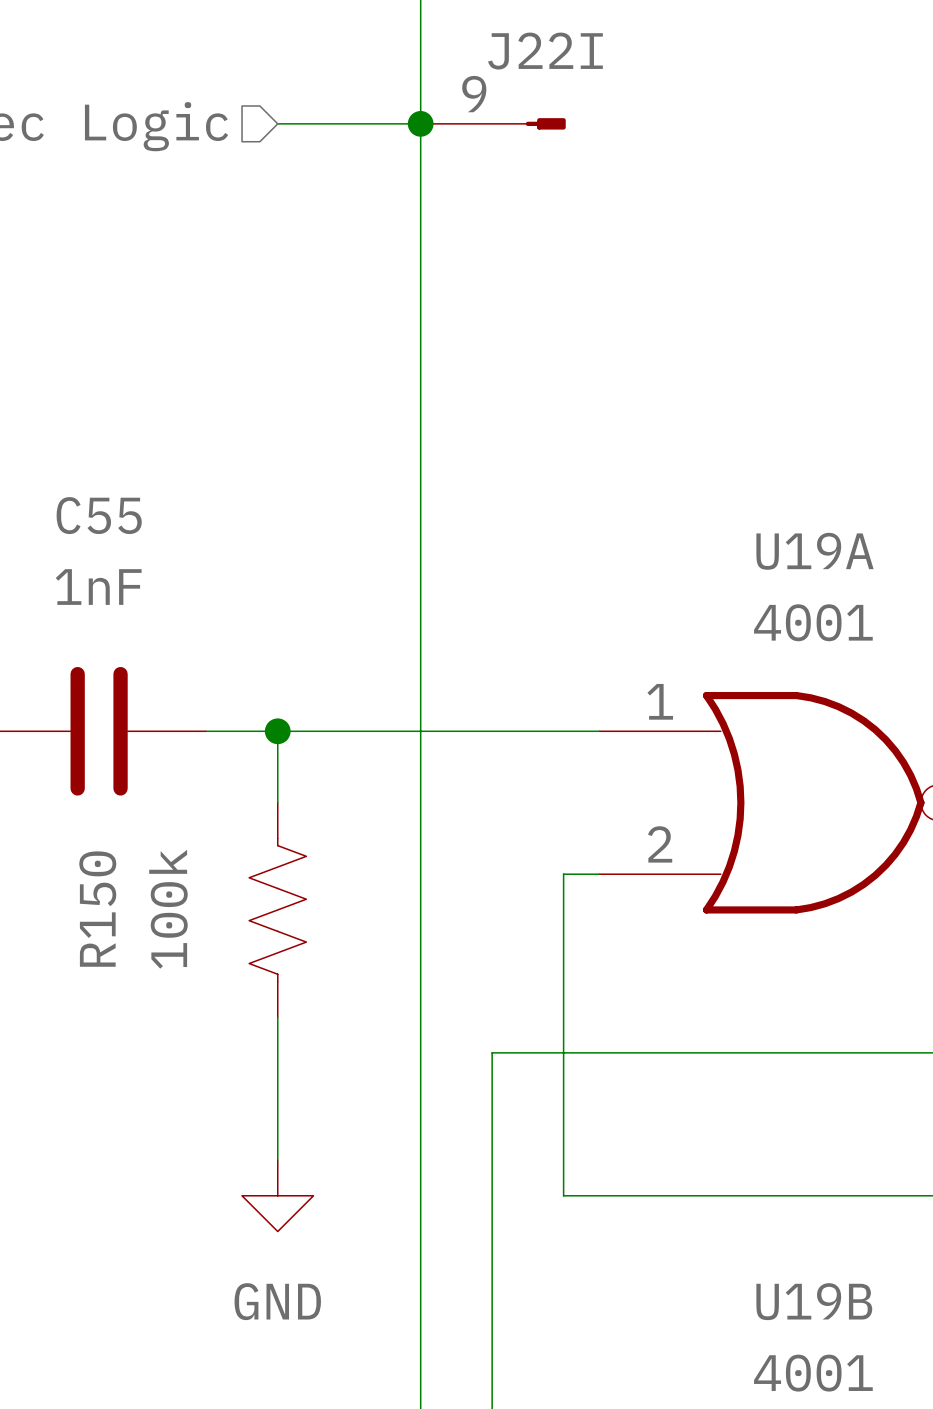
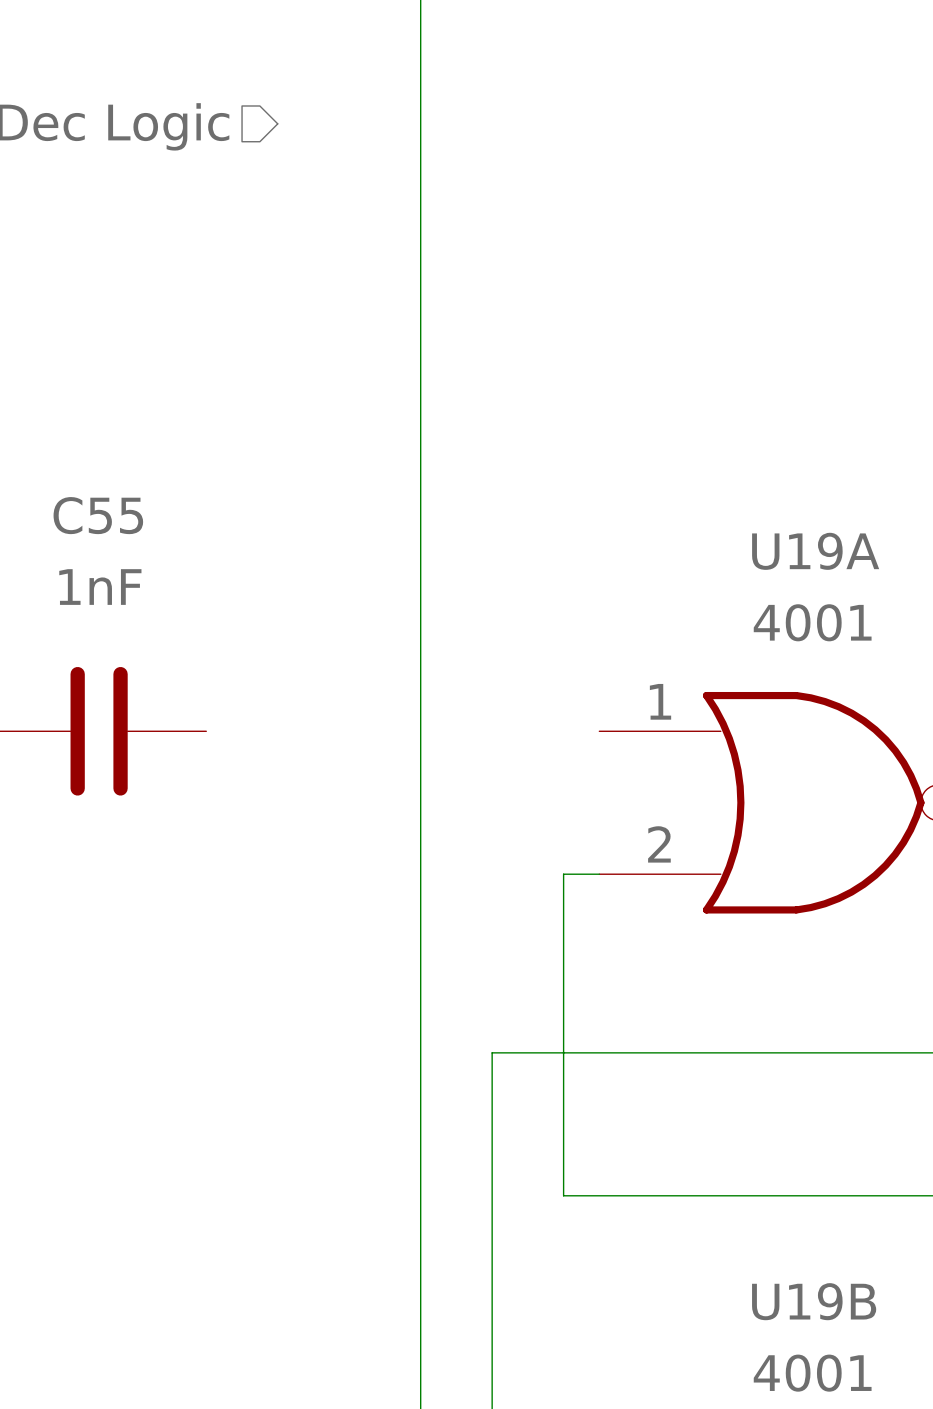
wire: (277, 123) (420, 123) -> none
junction: (420, 123) -> none
J22I: (493, 123) -> none
wire: (206, 731) (599, 731) -> none
wire: (277, 731) (277, 802) -> none
junction: (277, 731) -> none
R150: 100k (277, 909) -> none
wire: (277, 1017) (277, 1160) -> none
power symbol: GND (277, 1195) -> none

